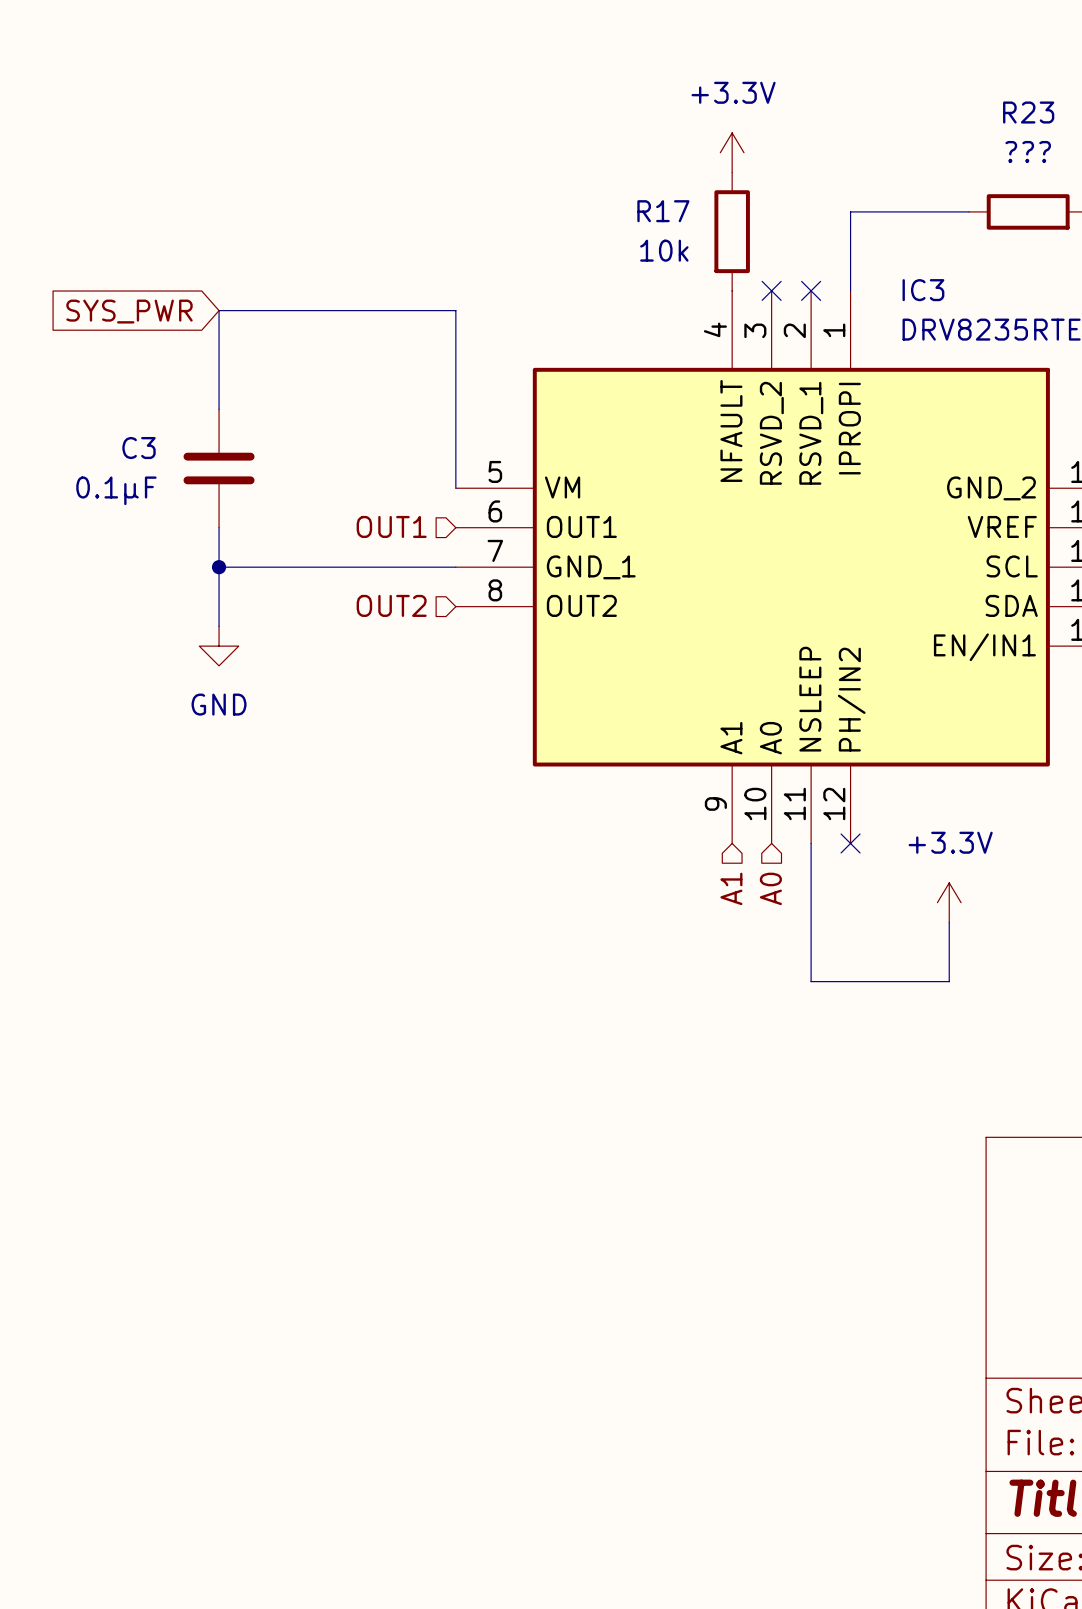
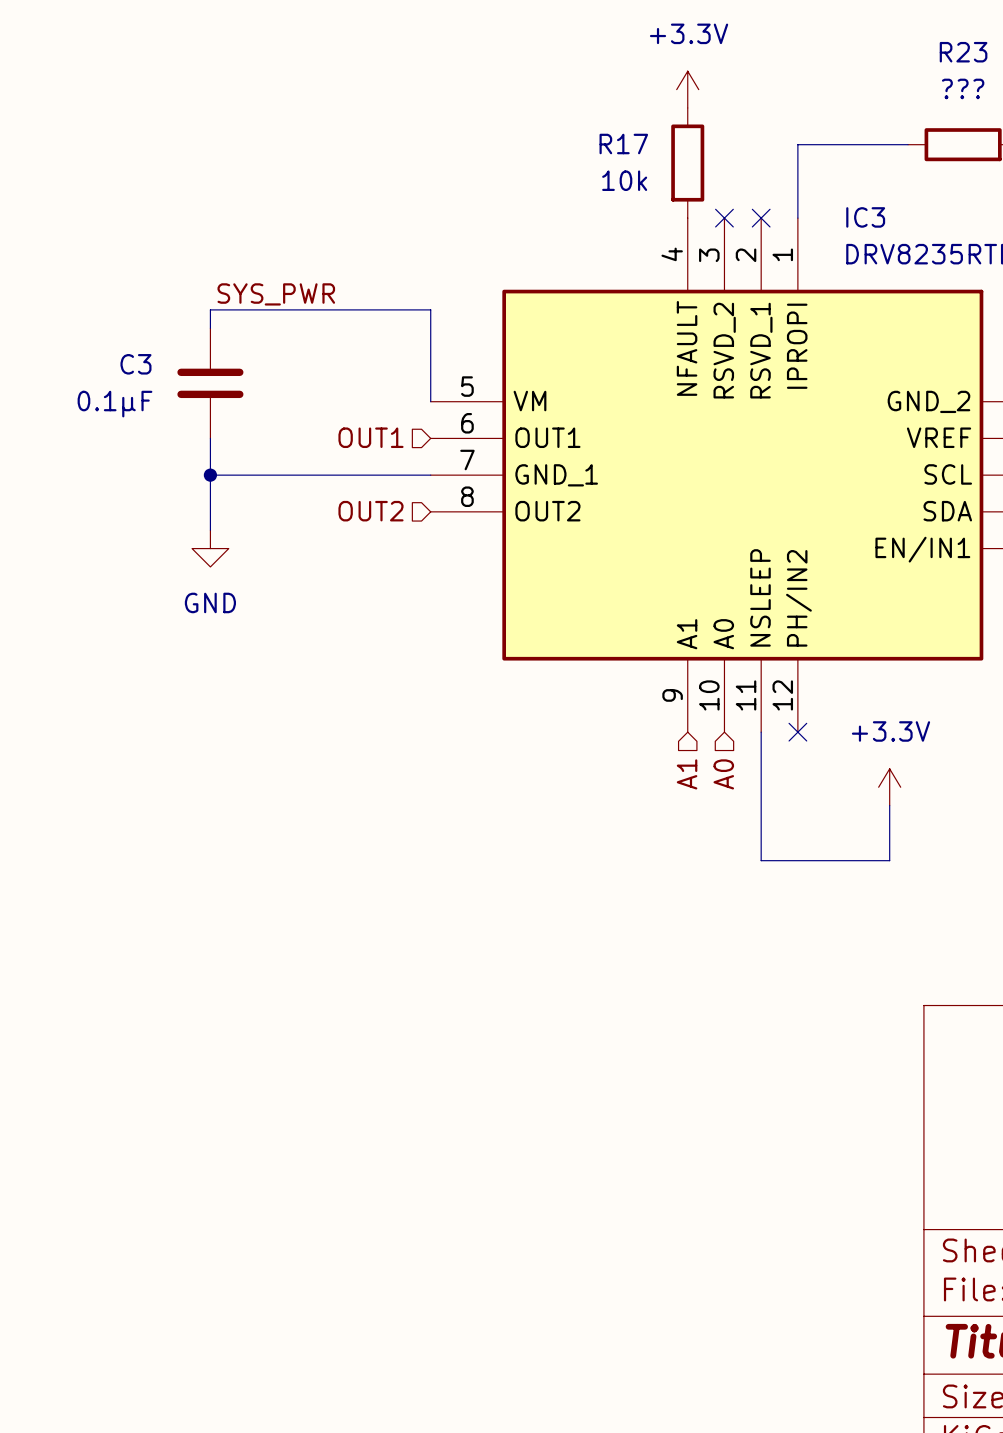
global label: SYS_PWR (129, 311) -> none
label: none -> SYS_PWR (276, 294)
wire: (219, 389) (219, 310) (455, 310) (455, 389) -> (210, 309) (430, 309)

